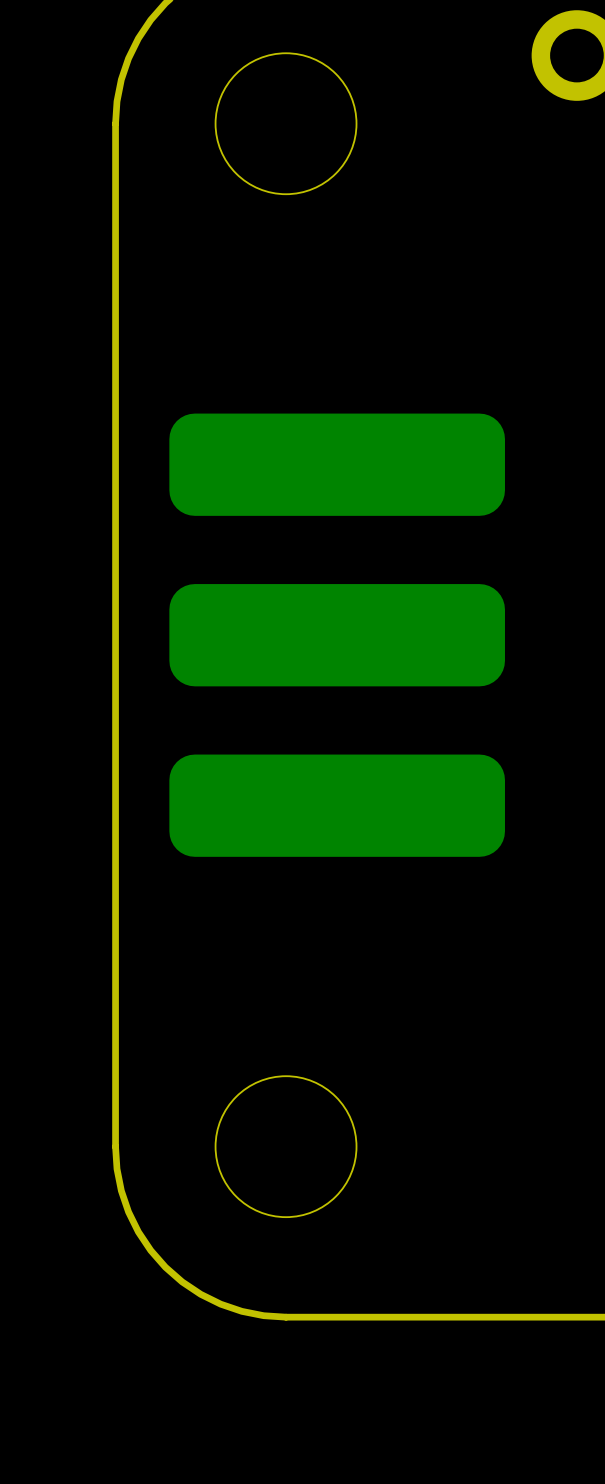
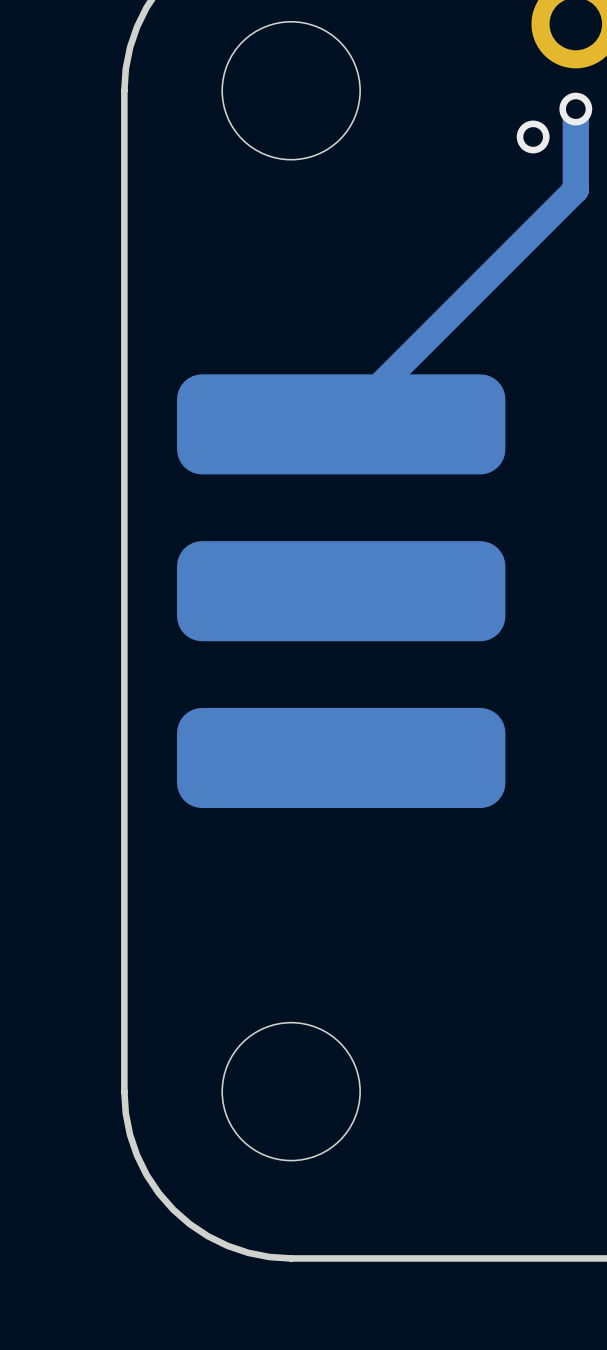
track: none -> (575, 109) (575, 189) (341, 424)
via: none -> (575, 109)
via: none -> (533, 136)

